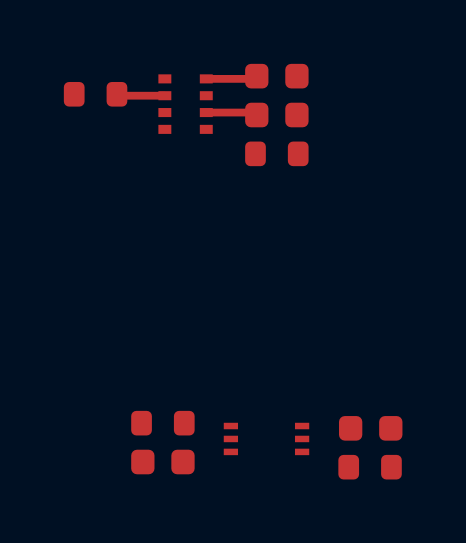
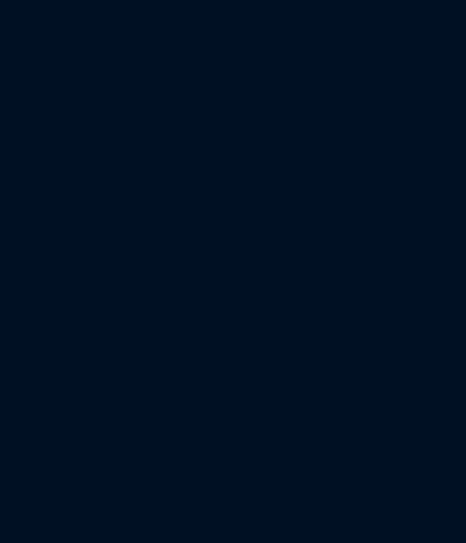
top track: (256, 76) (254, 78) (206, 78) -> none
part: (276, 76) -> none
part: (95, 94) -> none
top track: (116, 94) (164, 95) -> none
part: (185, 104) -> none
top track: (206, 112) (254, 112) (256, 115) -> none
part: (276, 115) -> none
part: (276, 153) -> none
part: (162, 423) -> none
part: (370, 428) -> none
part: (266, 438) -> none
part: (162, 462) -> none
part: (370, 467) -> none

